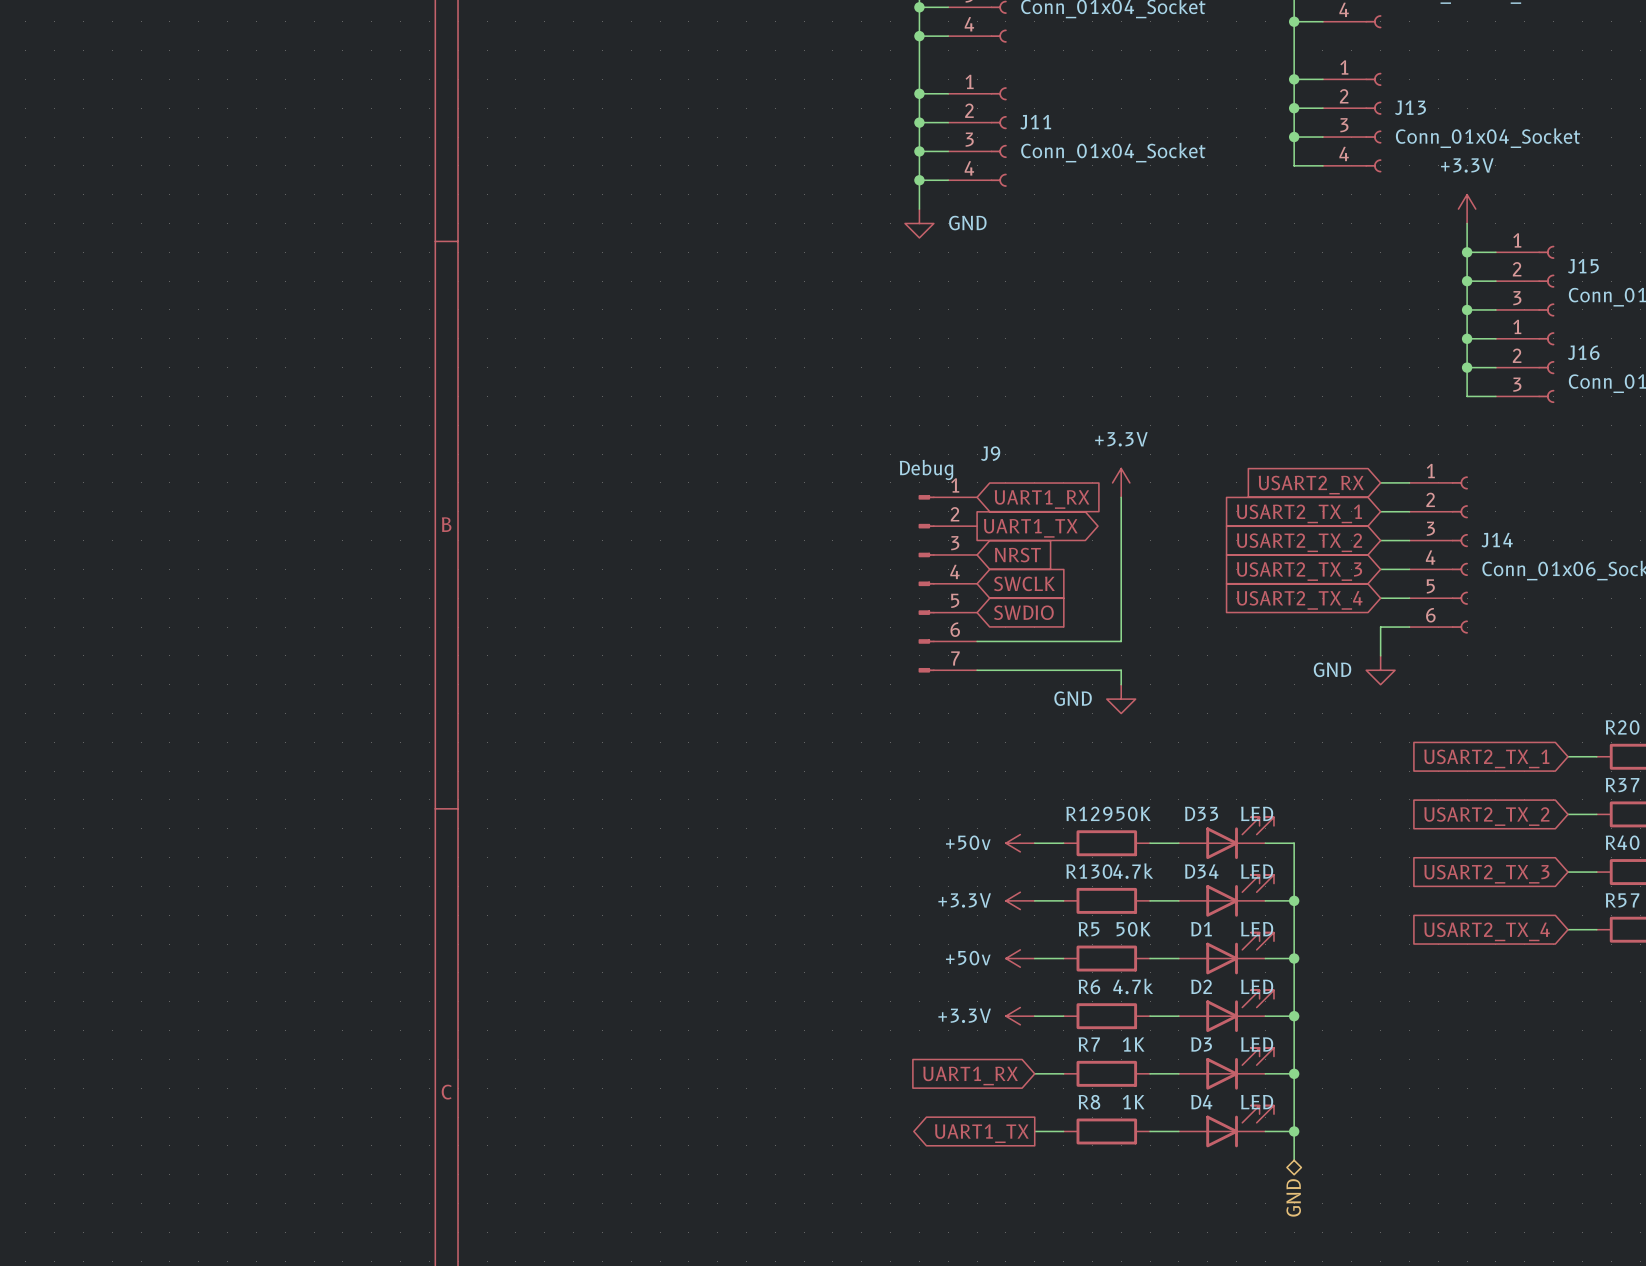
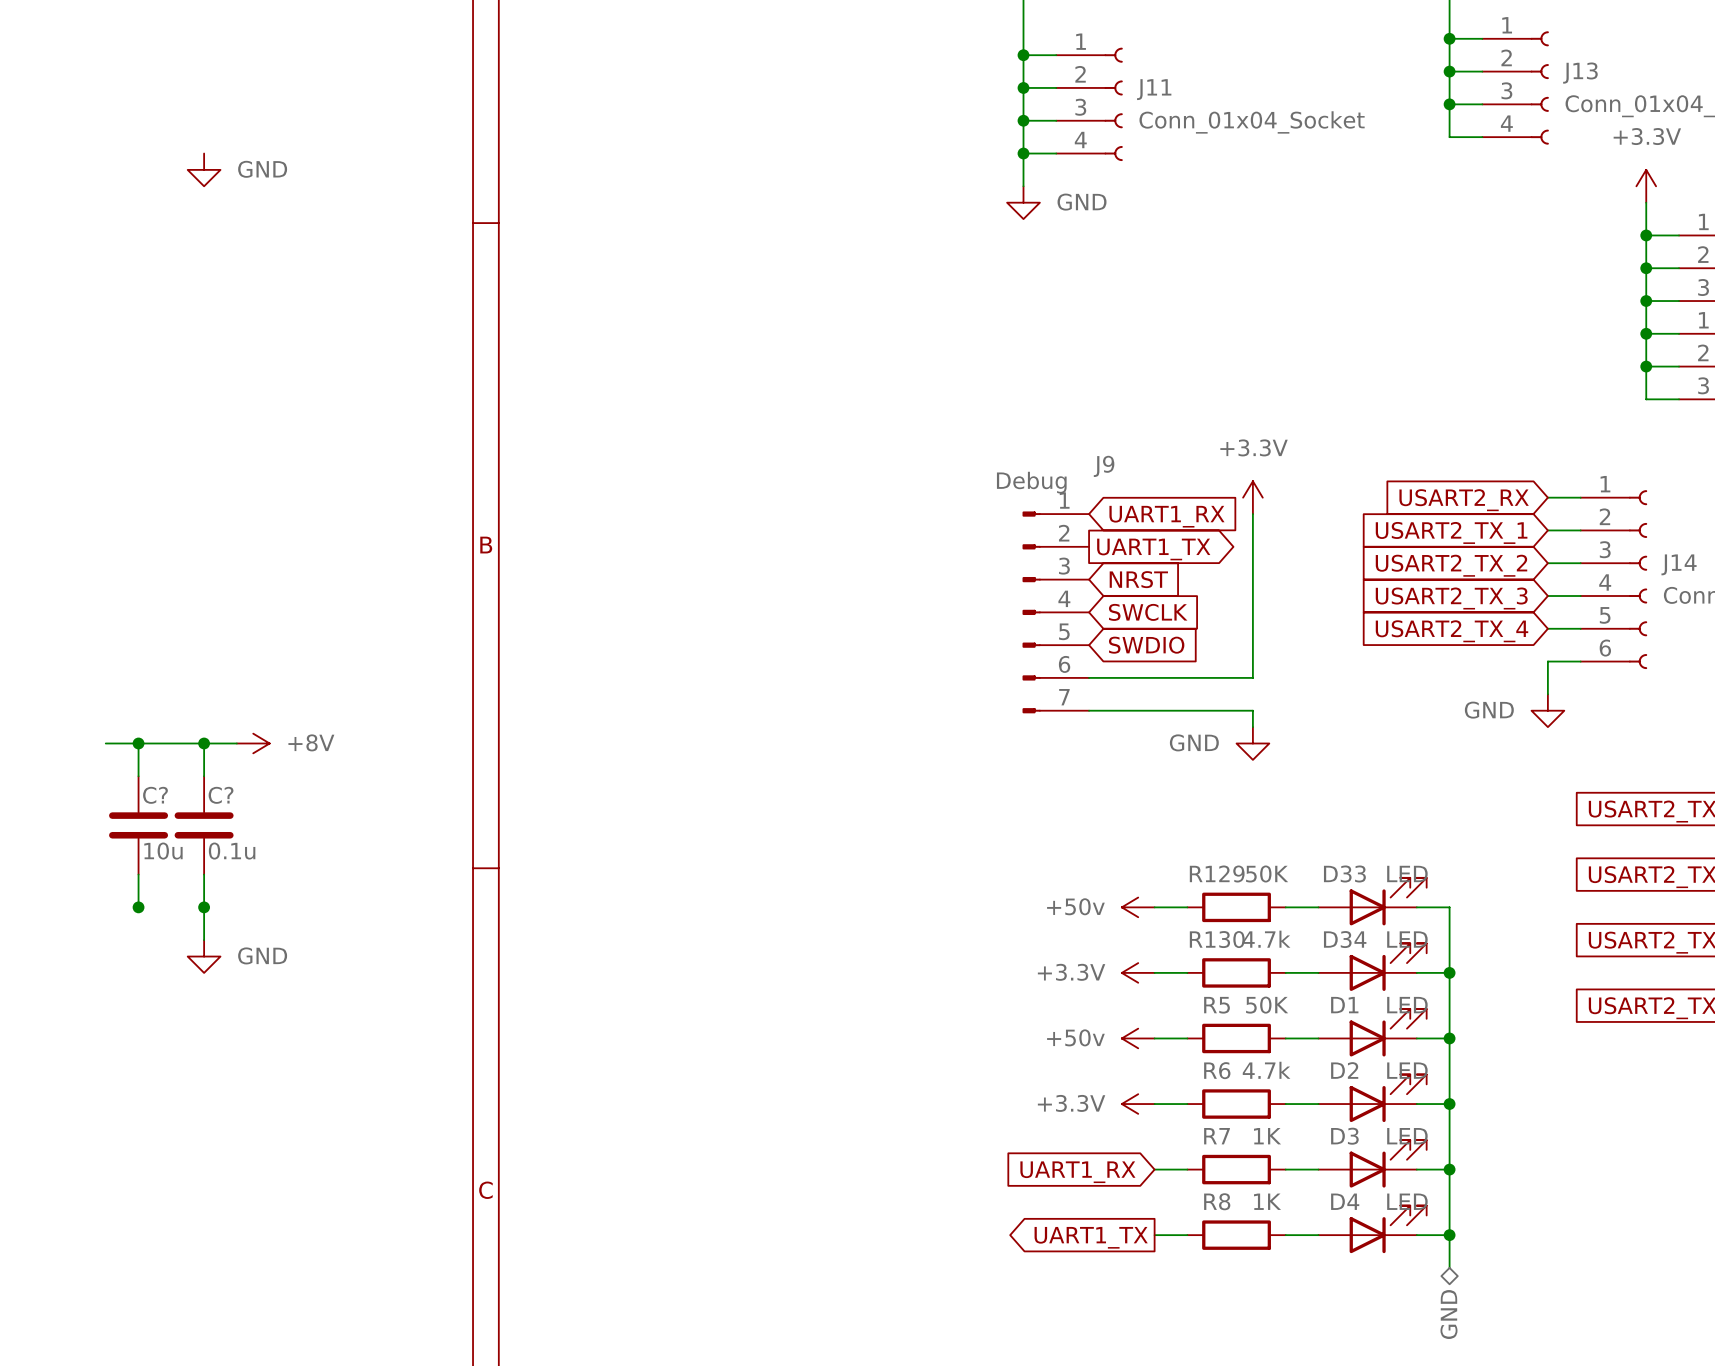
power symbol: none -> GND (204, 169)
wire: none -> (105, 743) (236, 743)
wire: none -> (138, 743) (138, 776)
junction: none -> (138, 743)
wire: none -> (204, 743) (204, 776)
junction: none -> (204, 743)
power symbol: none -> +8V (253, 743)
C?: none -> 10u (138, 825)
C?: none -> 0.1u (204, 825)
wire: none -> (138, 874) (138, 907)
wire: none -> (204, 874) (204, 940)
junction: none -> (138, 907)
junction: none -> (204, 907)
power symbol: none -> GND (204, 956)

